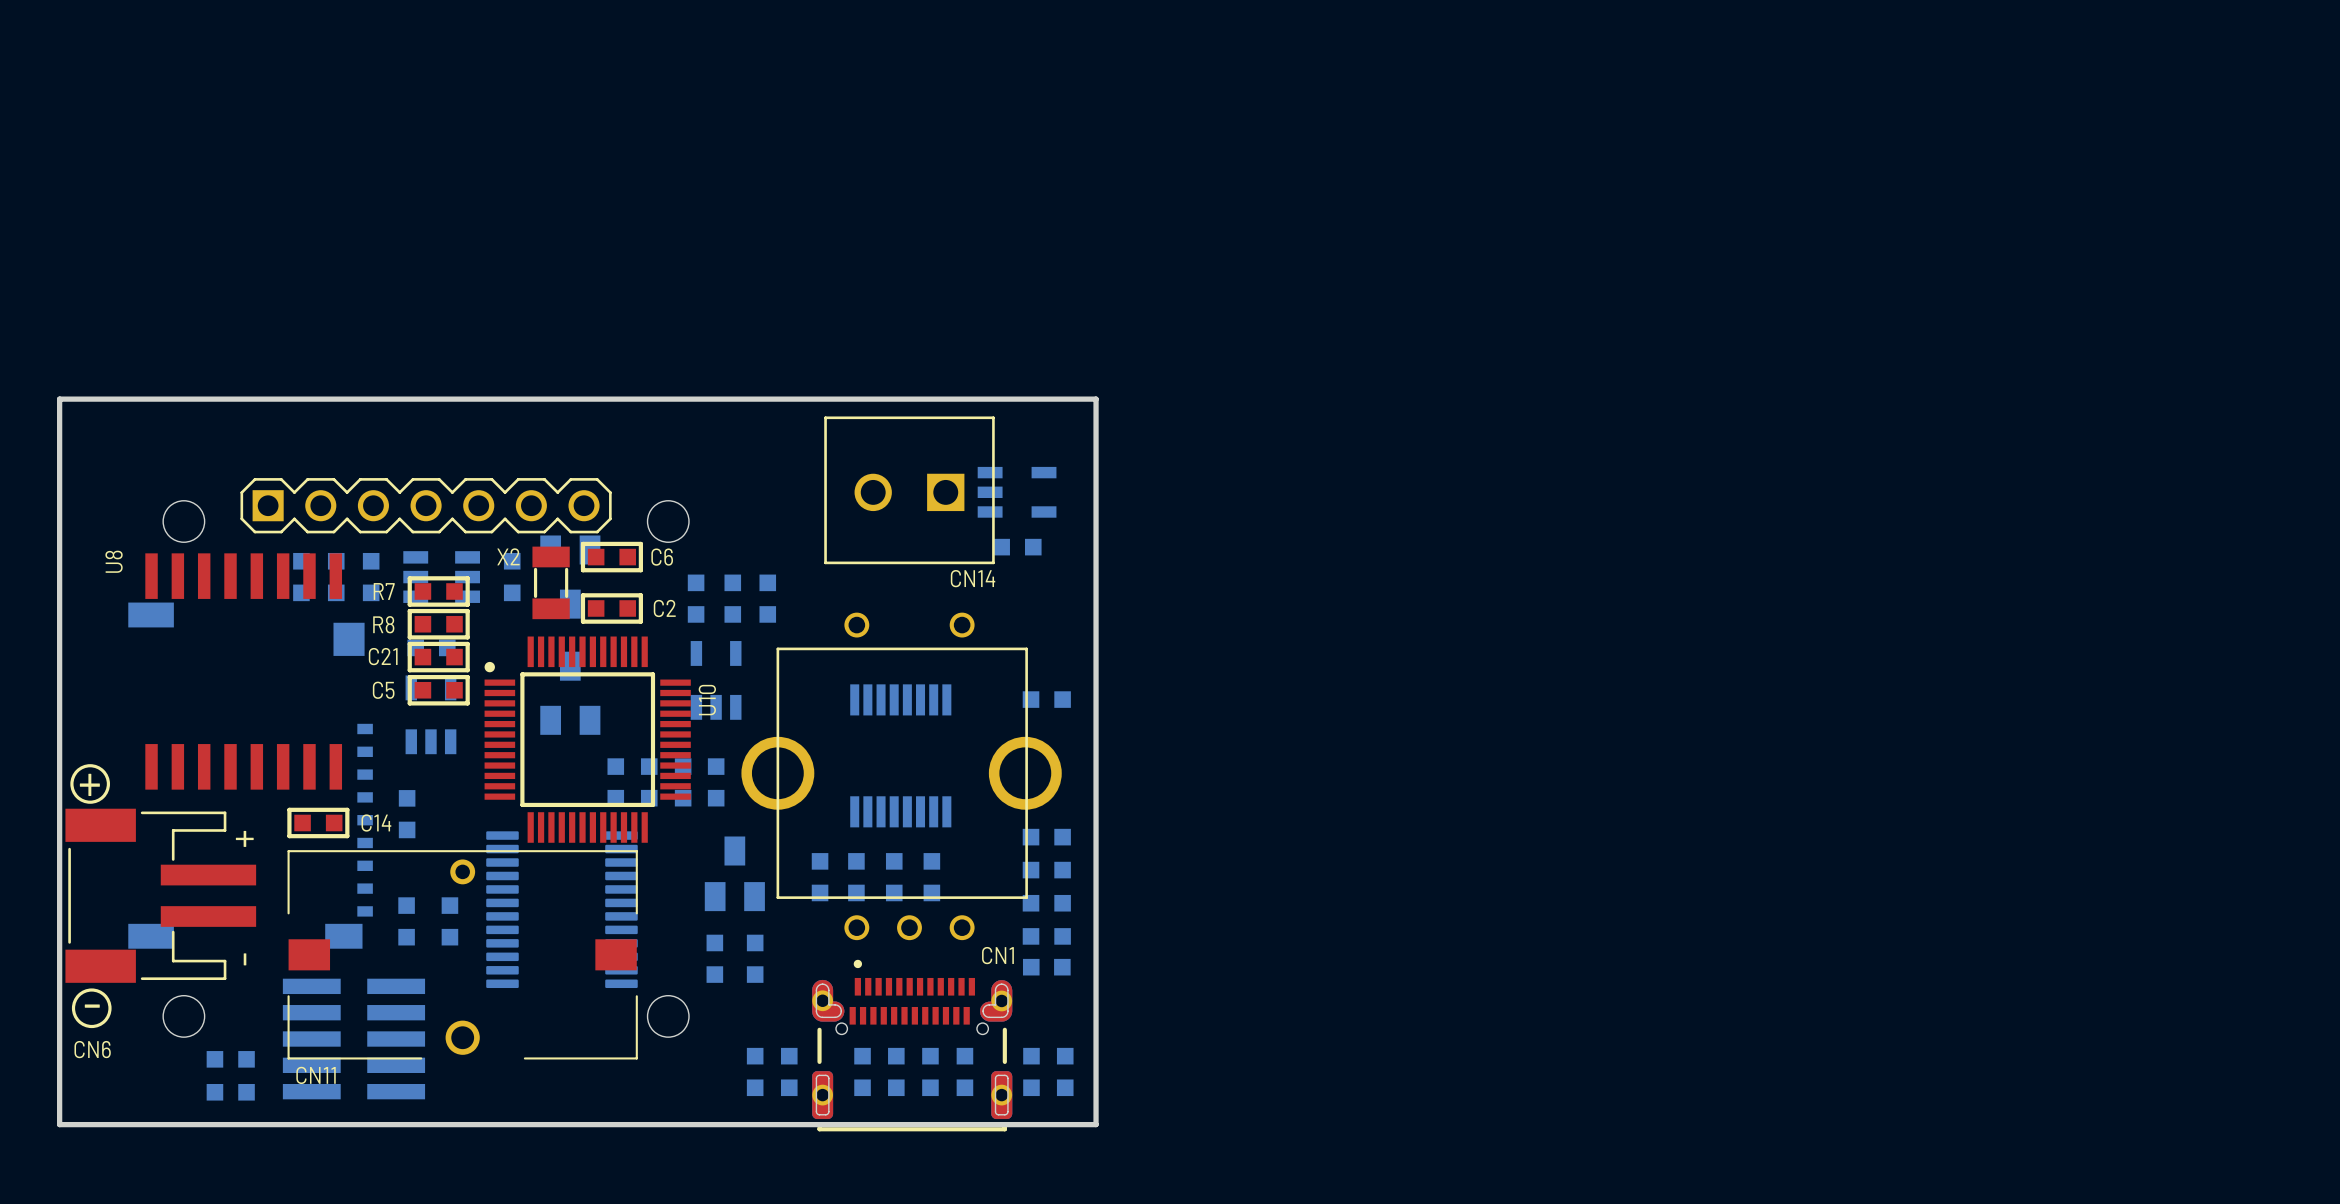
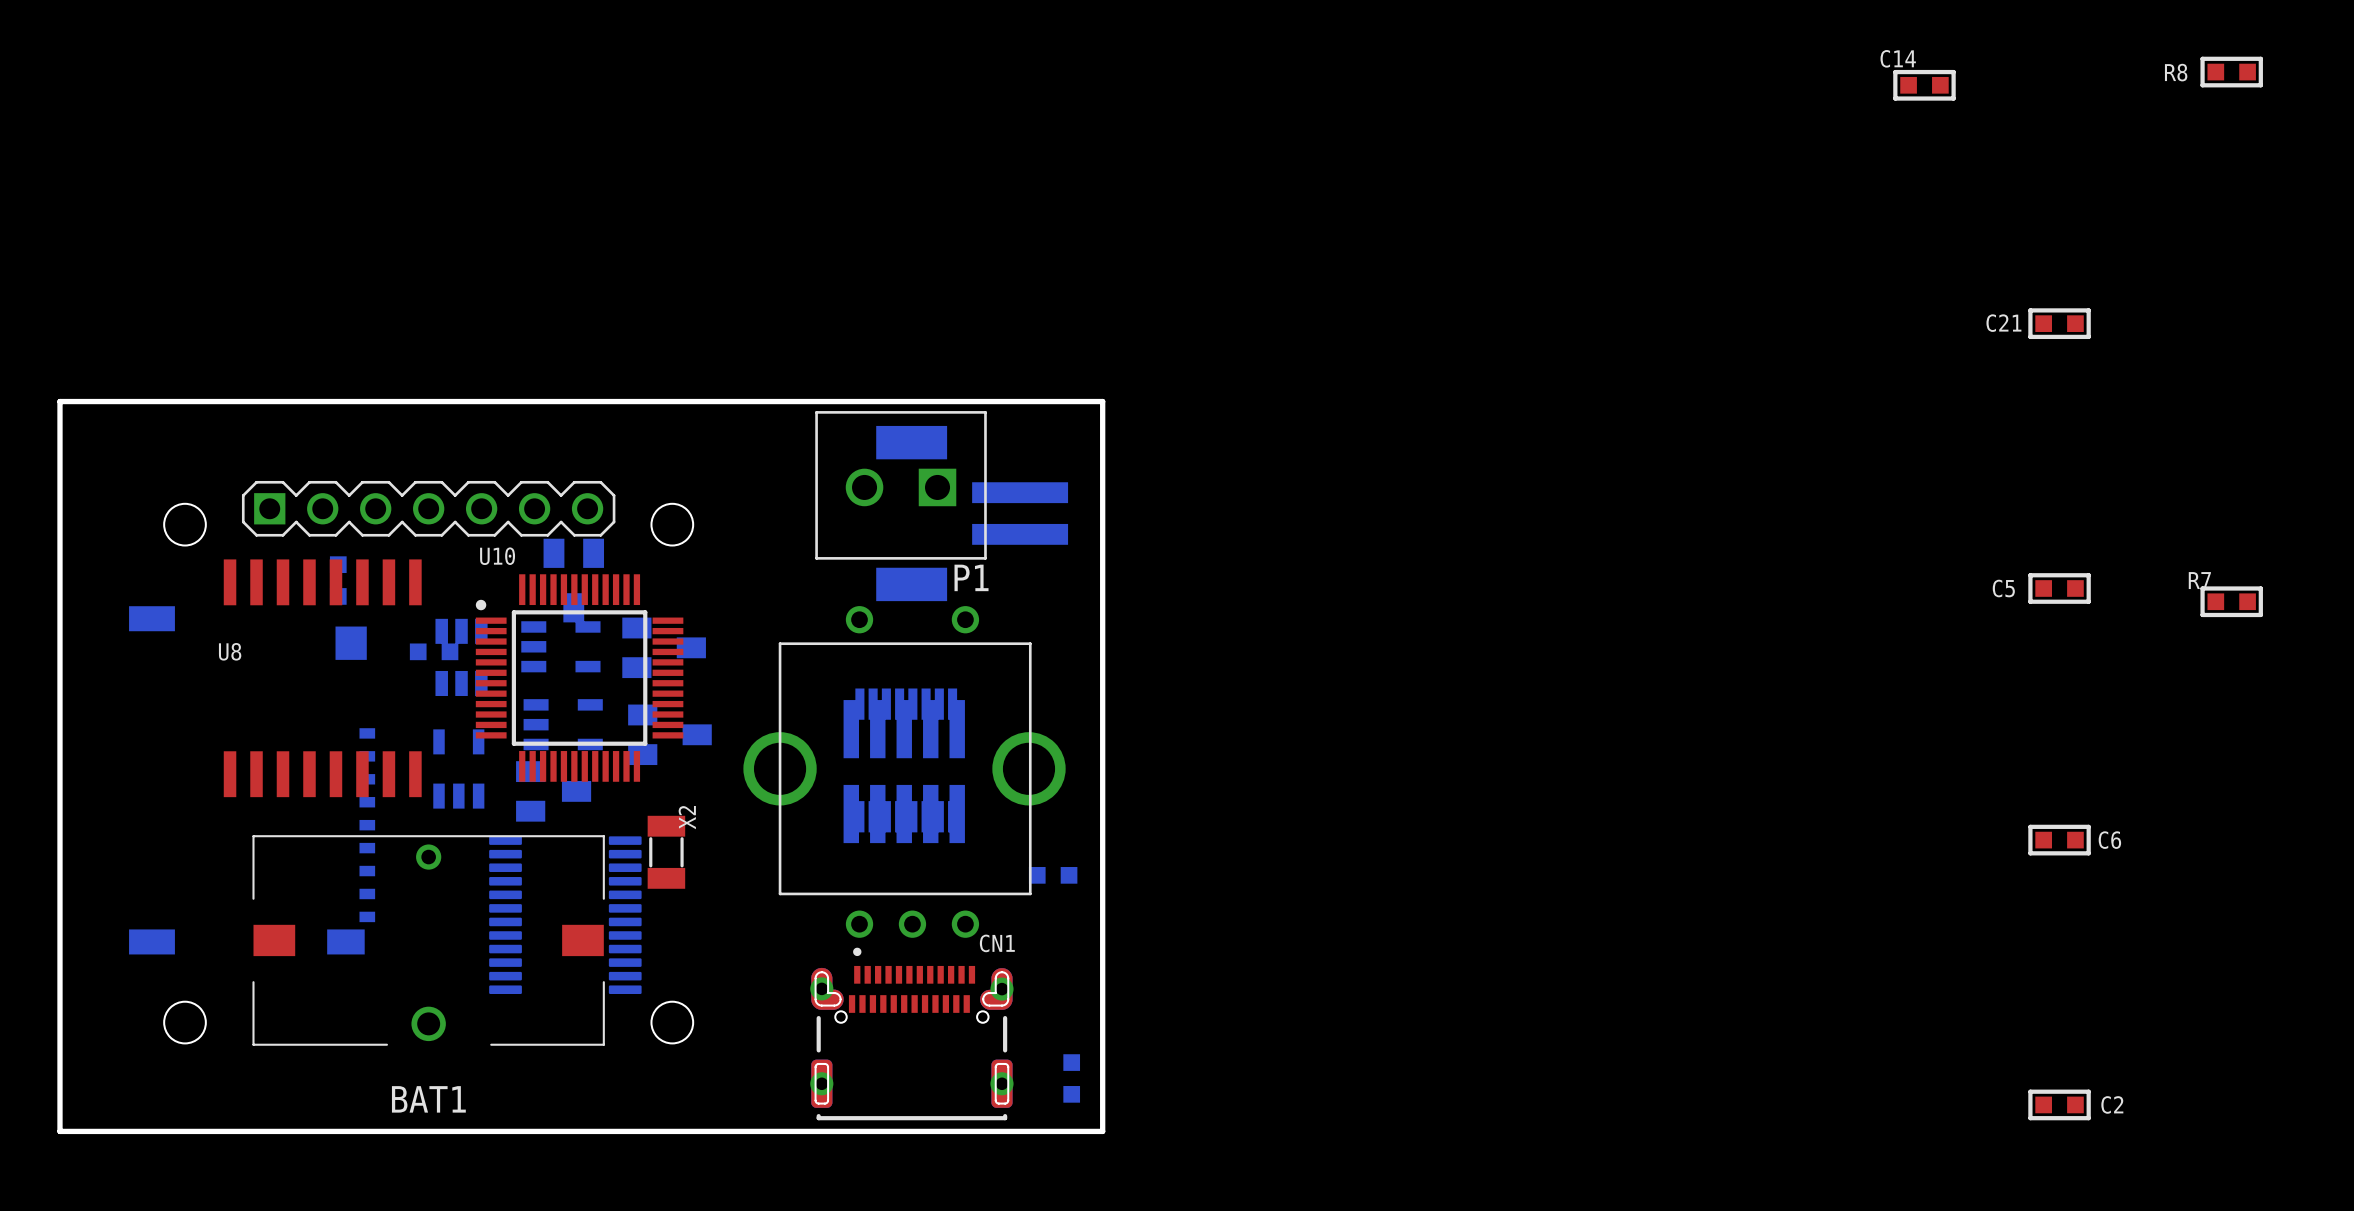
CN14 position: (909, 490) -> (901, 485)
part: (1017, 492) -> none
part: none -> (972, 513)
part: (1017, 547) -> none
X2 name rotation: 0° (508, 556) -> 90° counterclockwise (687, 817)
X2 name position: X2 (508, 556) -> X2 (687, 817)
C6 position: (611, 557) -> (2059, 840)
U8 name rotation: 0° (114, 561) -> 90° clockwise (230, 651)
U8 name position: U8 (114, 561) -> U8 (230, 651)
part: (301, 577) -> none
part: (371, 577) -> none
part rotation: 0° (441, 577) -> 90° clockwise (461, 657)
part position: (441, 577) -> (461, 657)
part: (512, 577) -> none
CN14 name: CN14 (973, 578) -> P1 (971, 577)
X2 position: (551, 582) -> (666, 852)
R7 name position: R7 (384, 591) -> R7 (2199, 580)
R7 position: (438, 591) -> (2231, 601)
part: (696, 598) -> none
part: (732, 598) -> none
part: (767, 598) -> none
C2 position: (611, 608) -> (2059, 1104)
R8 position: (438, 624) -> (2231, 72)
part: none -> (560, 646)
part: none -> (664, 647)
C21 position: (438, 657) -> (2059, 323)
U8 position: (243, 671) -> (322, 678)
part: (716, 680) -> none
C5 position: (438, 690) -> (2059, 588)
part: (570, 693) -> none
part: (1046, 699) -> none
U10 name rotation: 0° (707, 700) -> 90° clockwise (497, 556)
U10 name position: U10 (707, 700) -> U10 (497, 556)
part position: (430, 714) -> (458, 768)
part: none -> (563, 724)
part: none -> (669, 734)
U10 position: (587, 739) -> (579, 678)
drawing: [70, 764, 110, 804] -> none
part: none -> (904, 771)
part: none -> (904, 771)
part: (901, 776) -> none
part: (615, 782) -> none
part: (649, 782) -> none
part: (683, 782) -> none
part: (716, 782) -> none
text: + (89, 784) -> none
part: (407, 814) -> none
C14 position: (318, 822) -> (1924, 85)
C14 name position: C14 (376, 823) -> C14 (1898, 58)
part: (1046, 837) -> none
part rotation: 0° (734, 873) -> 90° clockwise (553, 791)
part position: (734, 873) -> (553, 791)
part: (820, 877) -> none
part: (856, 877) -> none
part: (894, 877) -> none
part: (931, 877) -> none
CN6: (160, 895) -> none
part: (1046, 903) -> none
part: (406, 921) -> none
part: (449, 921) -> none
BAT1: none -> (428, 940)
part: (1046, 936) -> none
CN11: (462, 954) -> none
CN1 name position: CN1 (997, 955) -> CN1 (997, 943)
part: (714, 958) -> none
part: (755, 958) -> none
CN1 footprint: [812, 959, 1013, 1132] -> [810, 947, 1014, 1121]
part: (1046, 967) -> none
drawing: [71, 988, 112, 1029] -> none
text: - (92, 1006) -> none
part: (353, 1039) -> none
part: (230, 1059) -> none
part: (755, 1071) -> none
part: (789, 1071) -> none
part: (862, 1071) -> none
part: (896, 1071) -> none
part: (930, 1071) -> none
part: (964, 1071) -> none
part: (1031, 1071) -> none
part: (230, 1092) -> none

